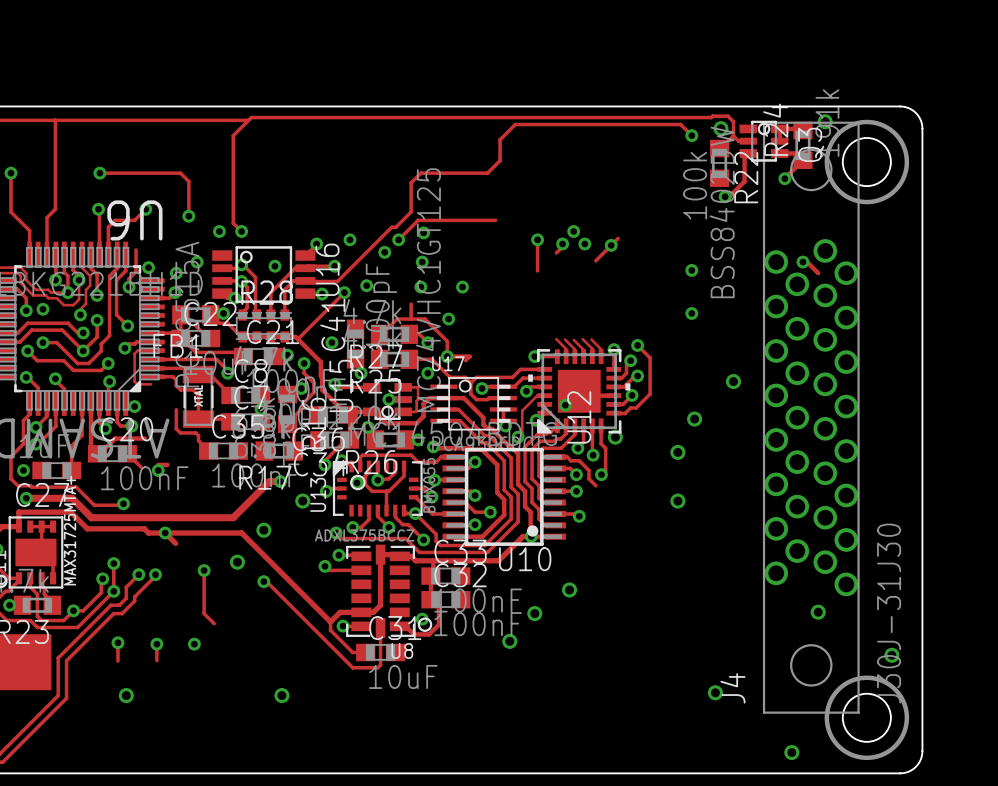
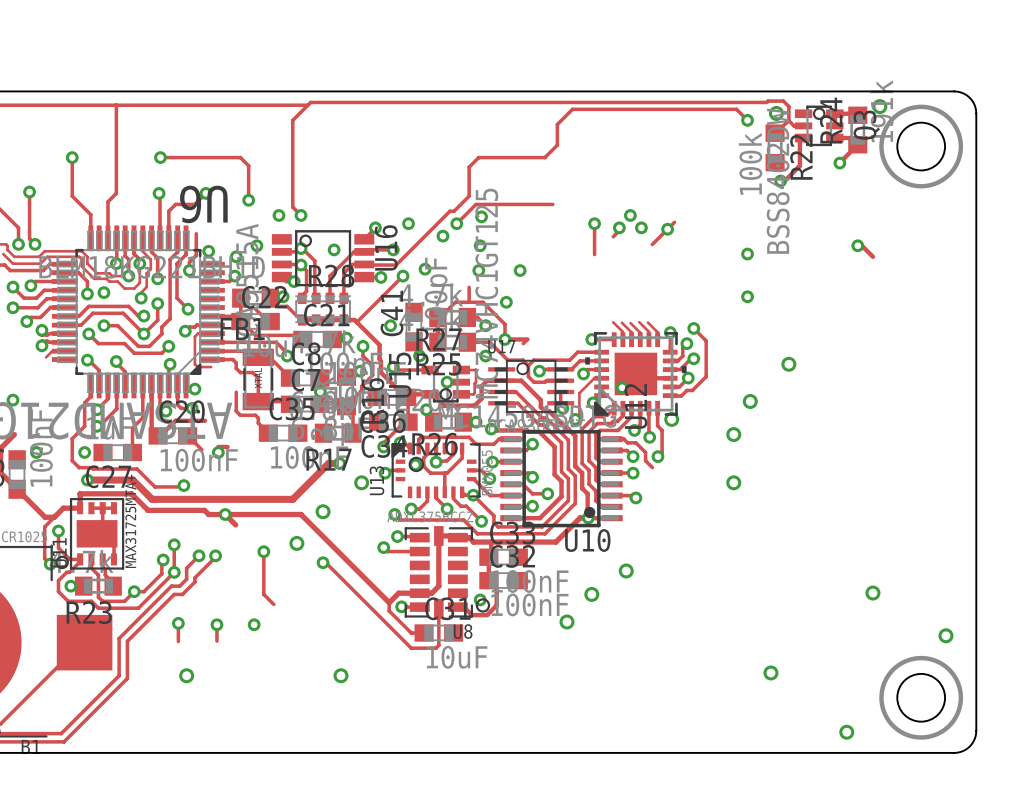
J4: J30J-31J30 (811, 417) -> none

